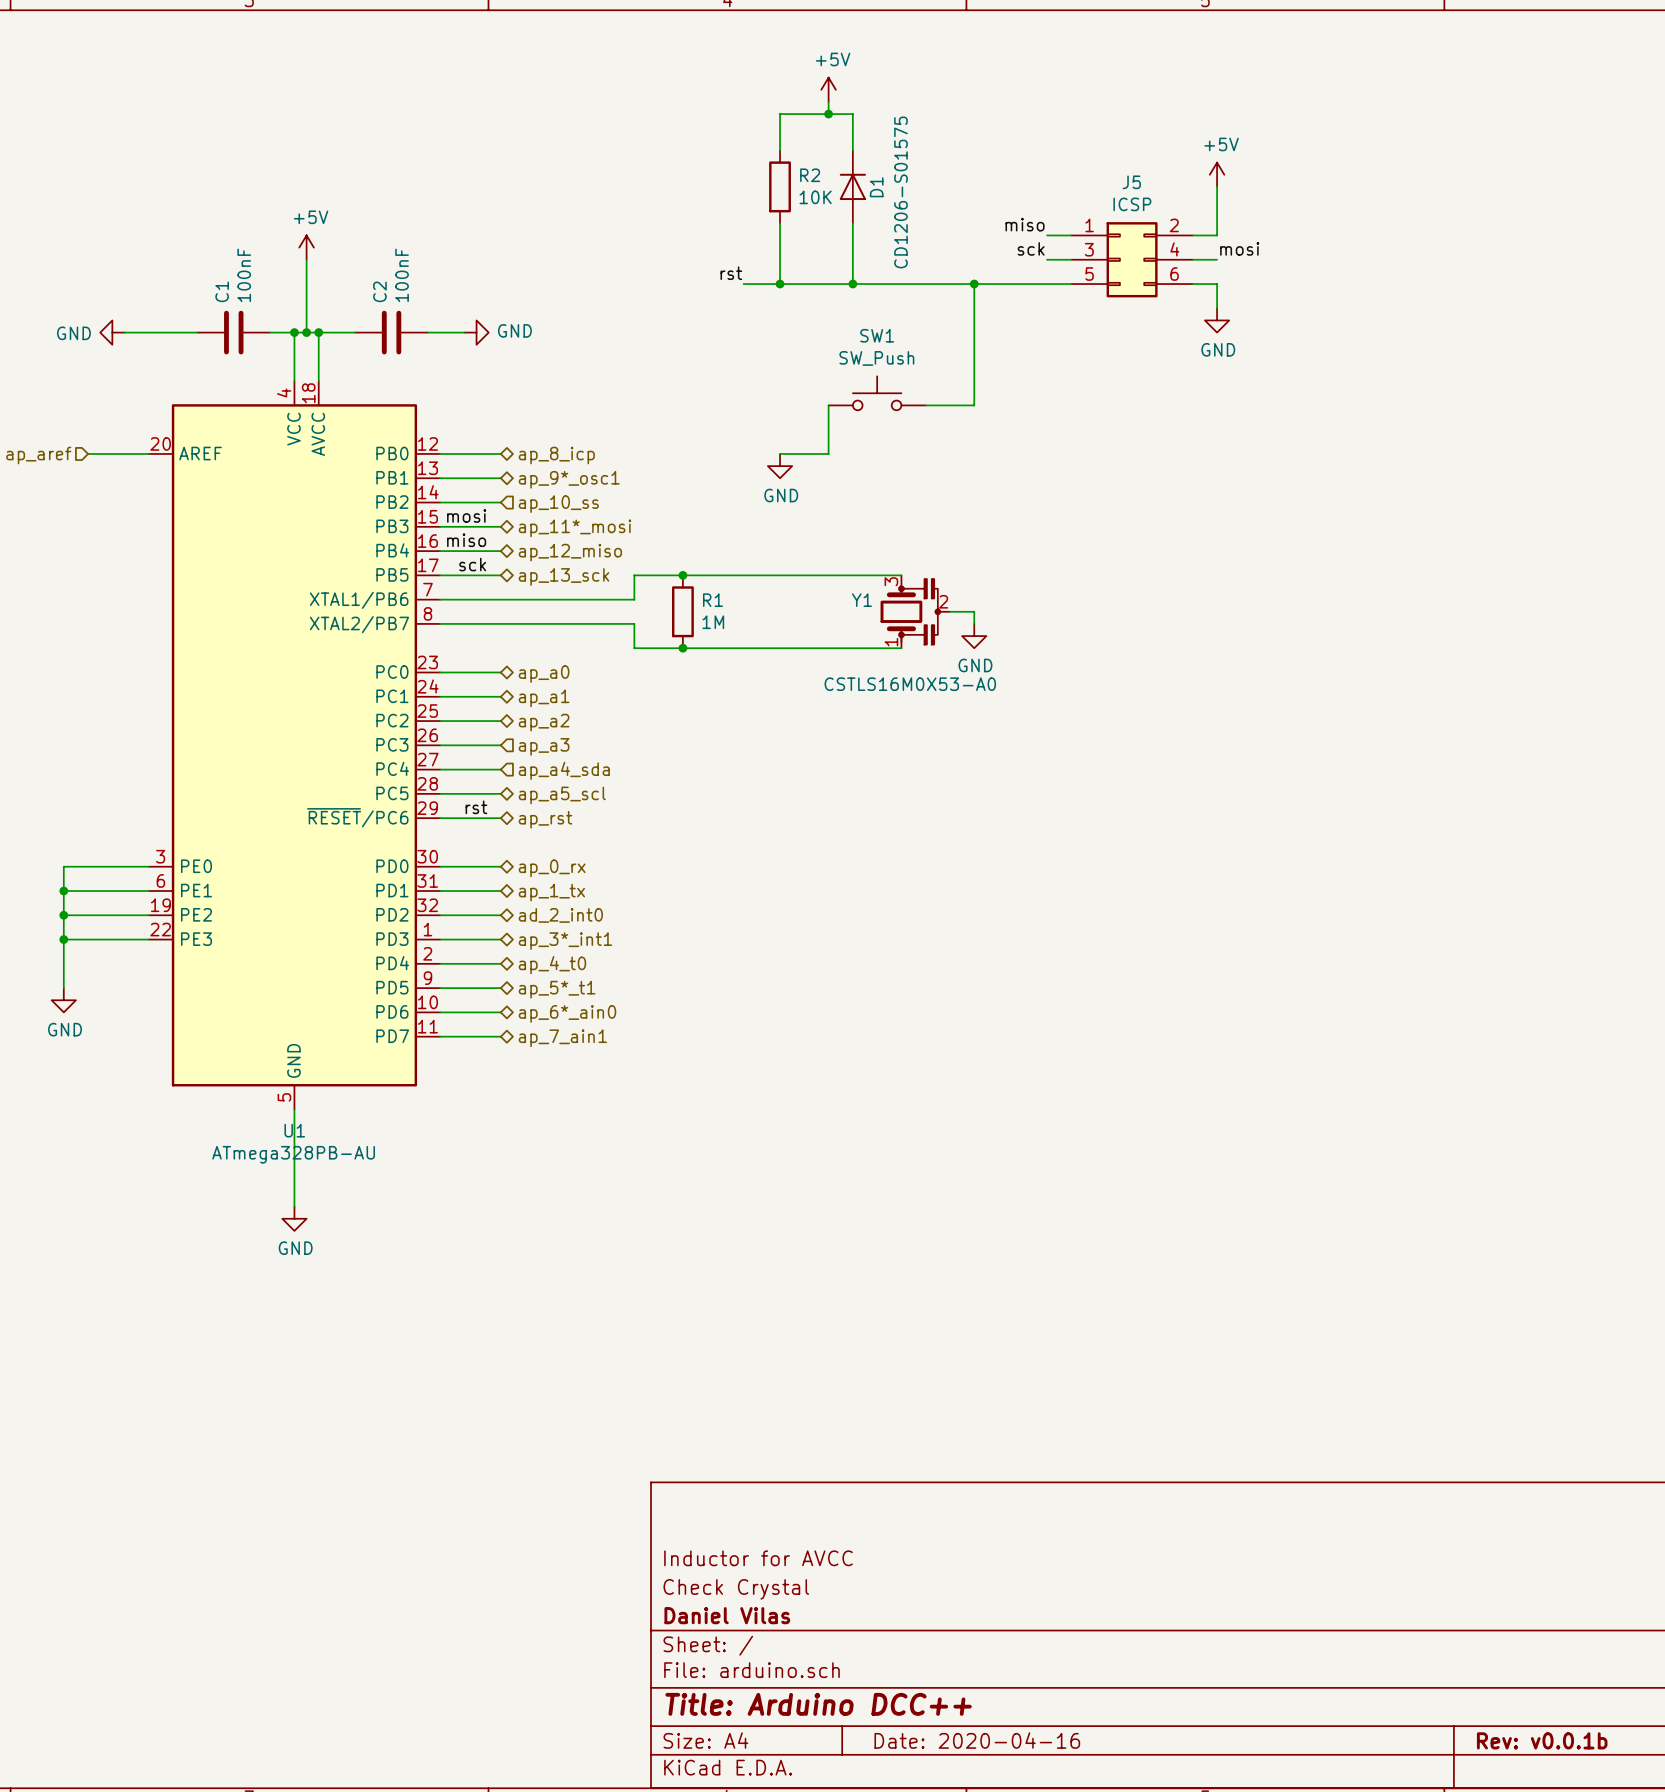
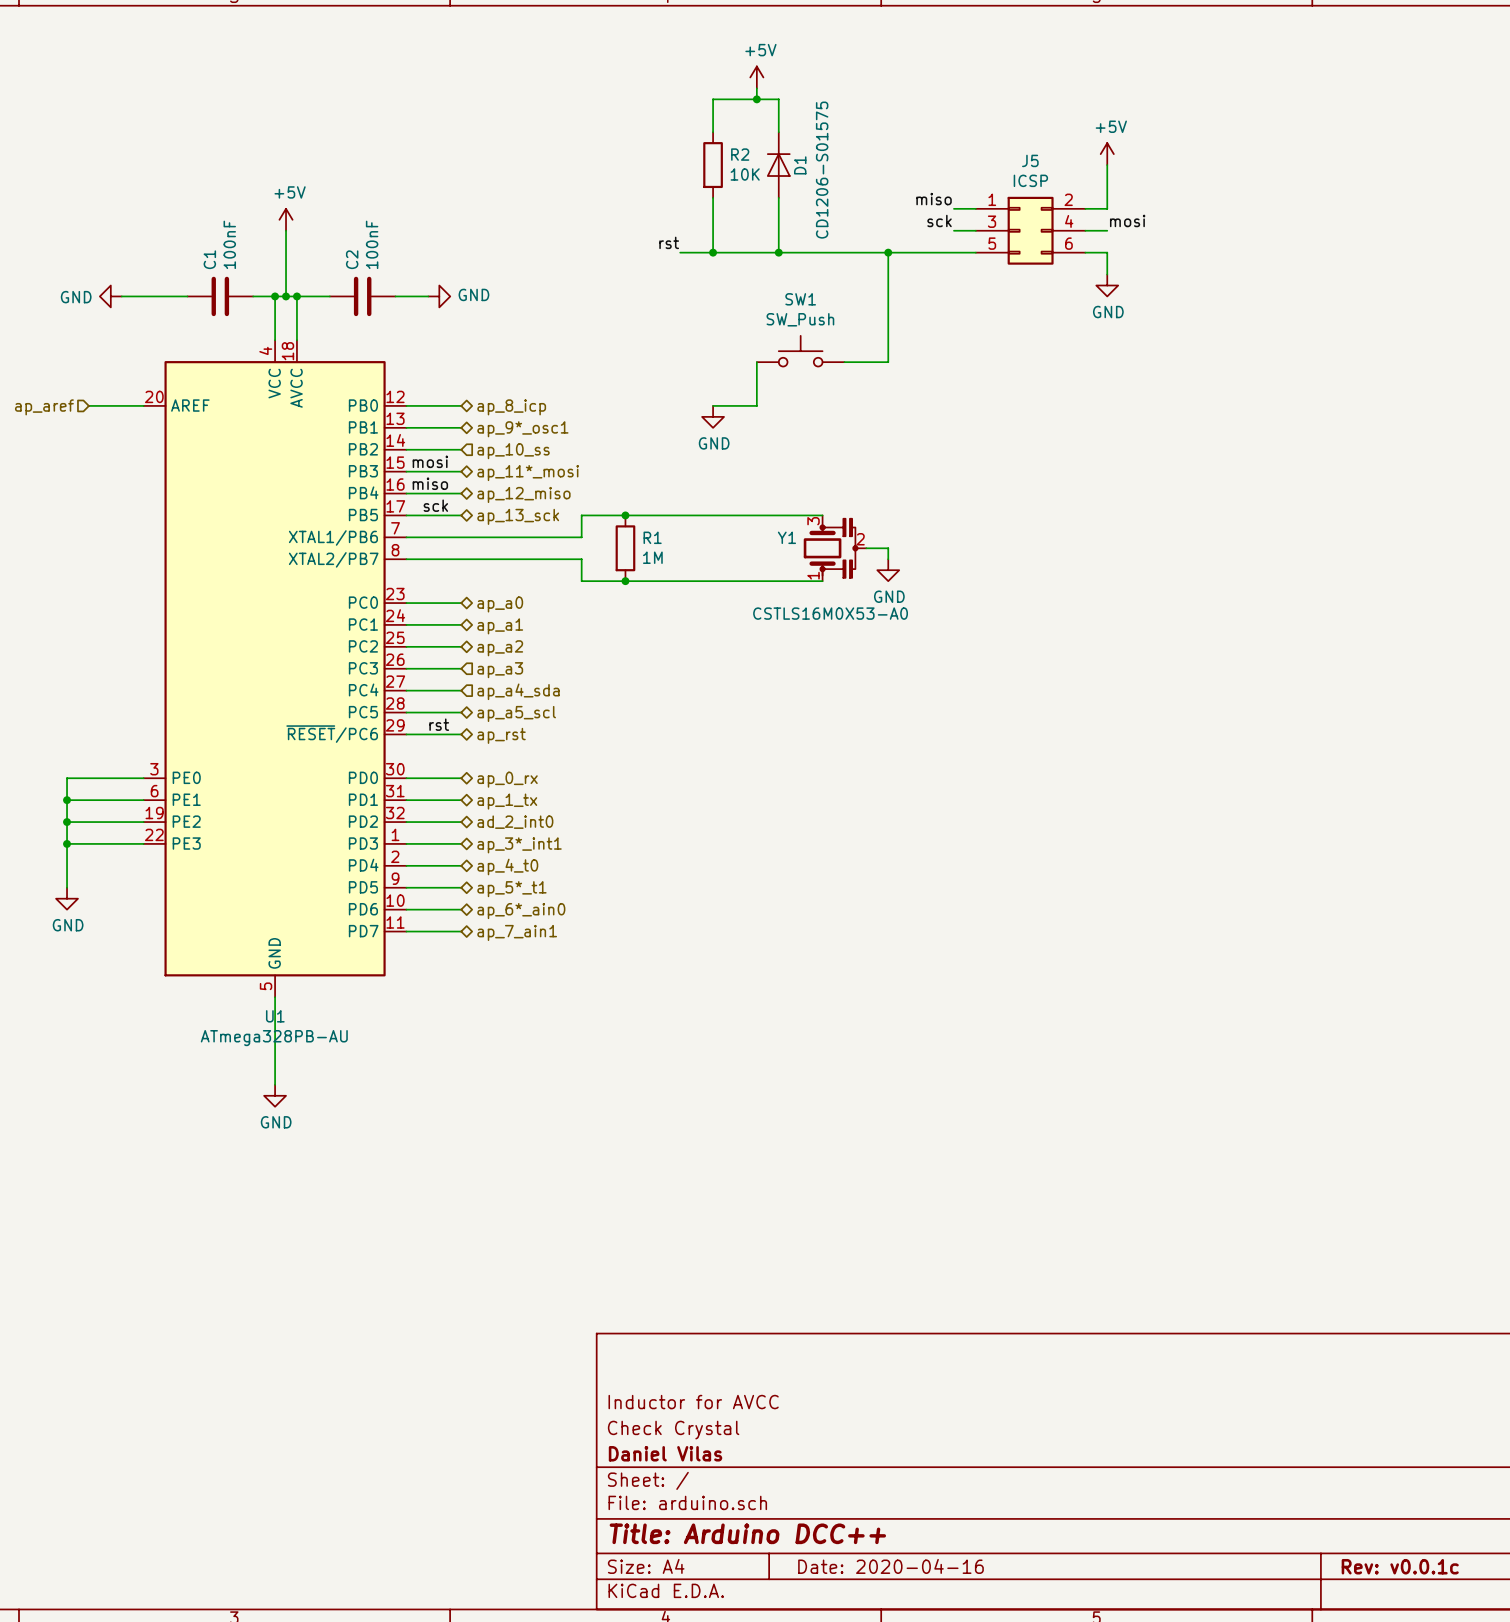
title block: Rev: v0.0.1b (1542, 1740) -> Rev: v0.0.1c (1400, 1566)

